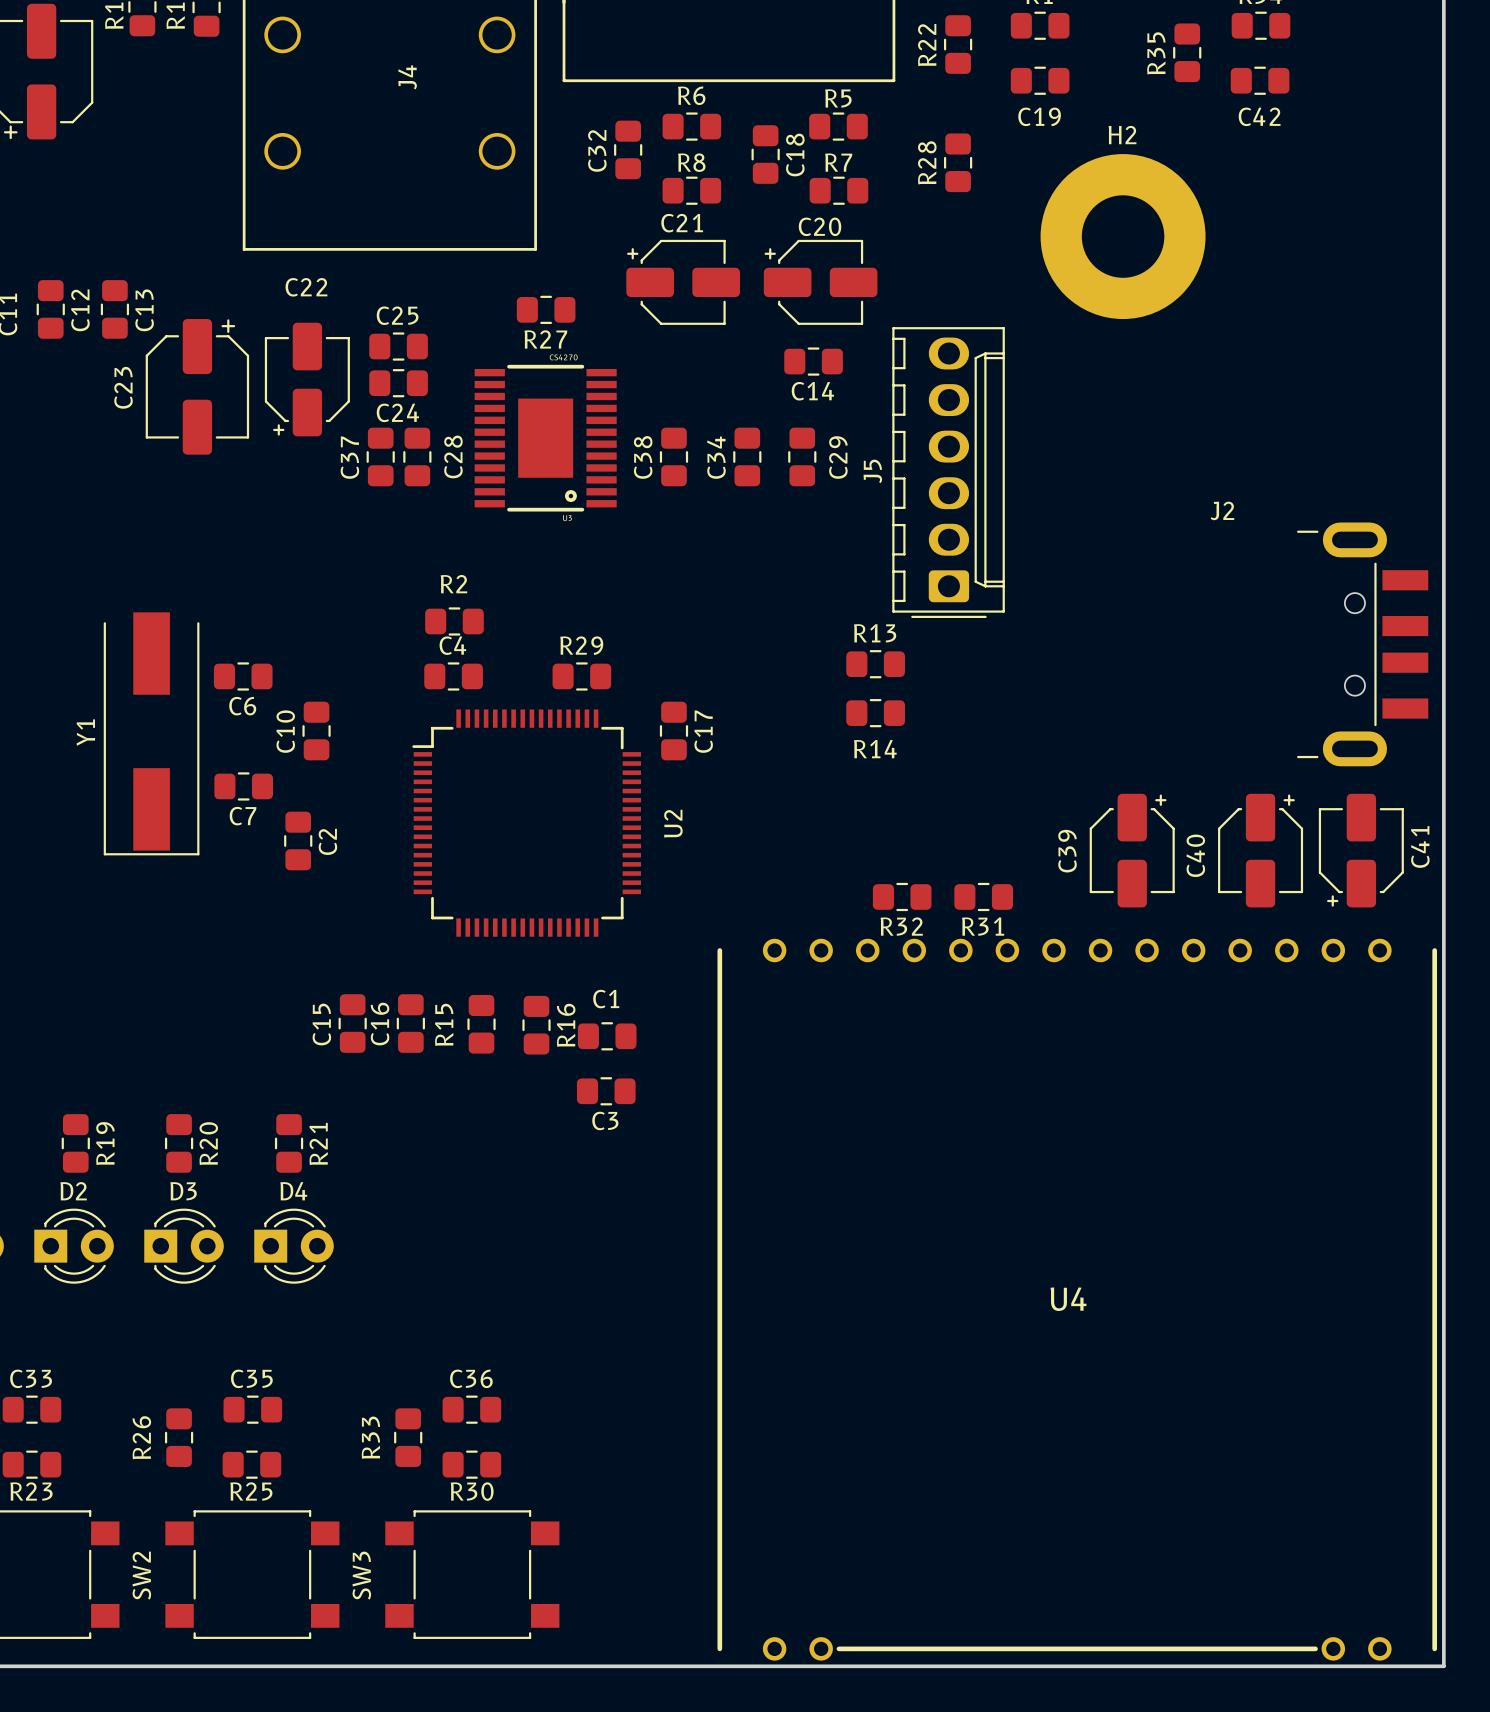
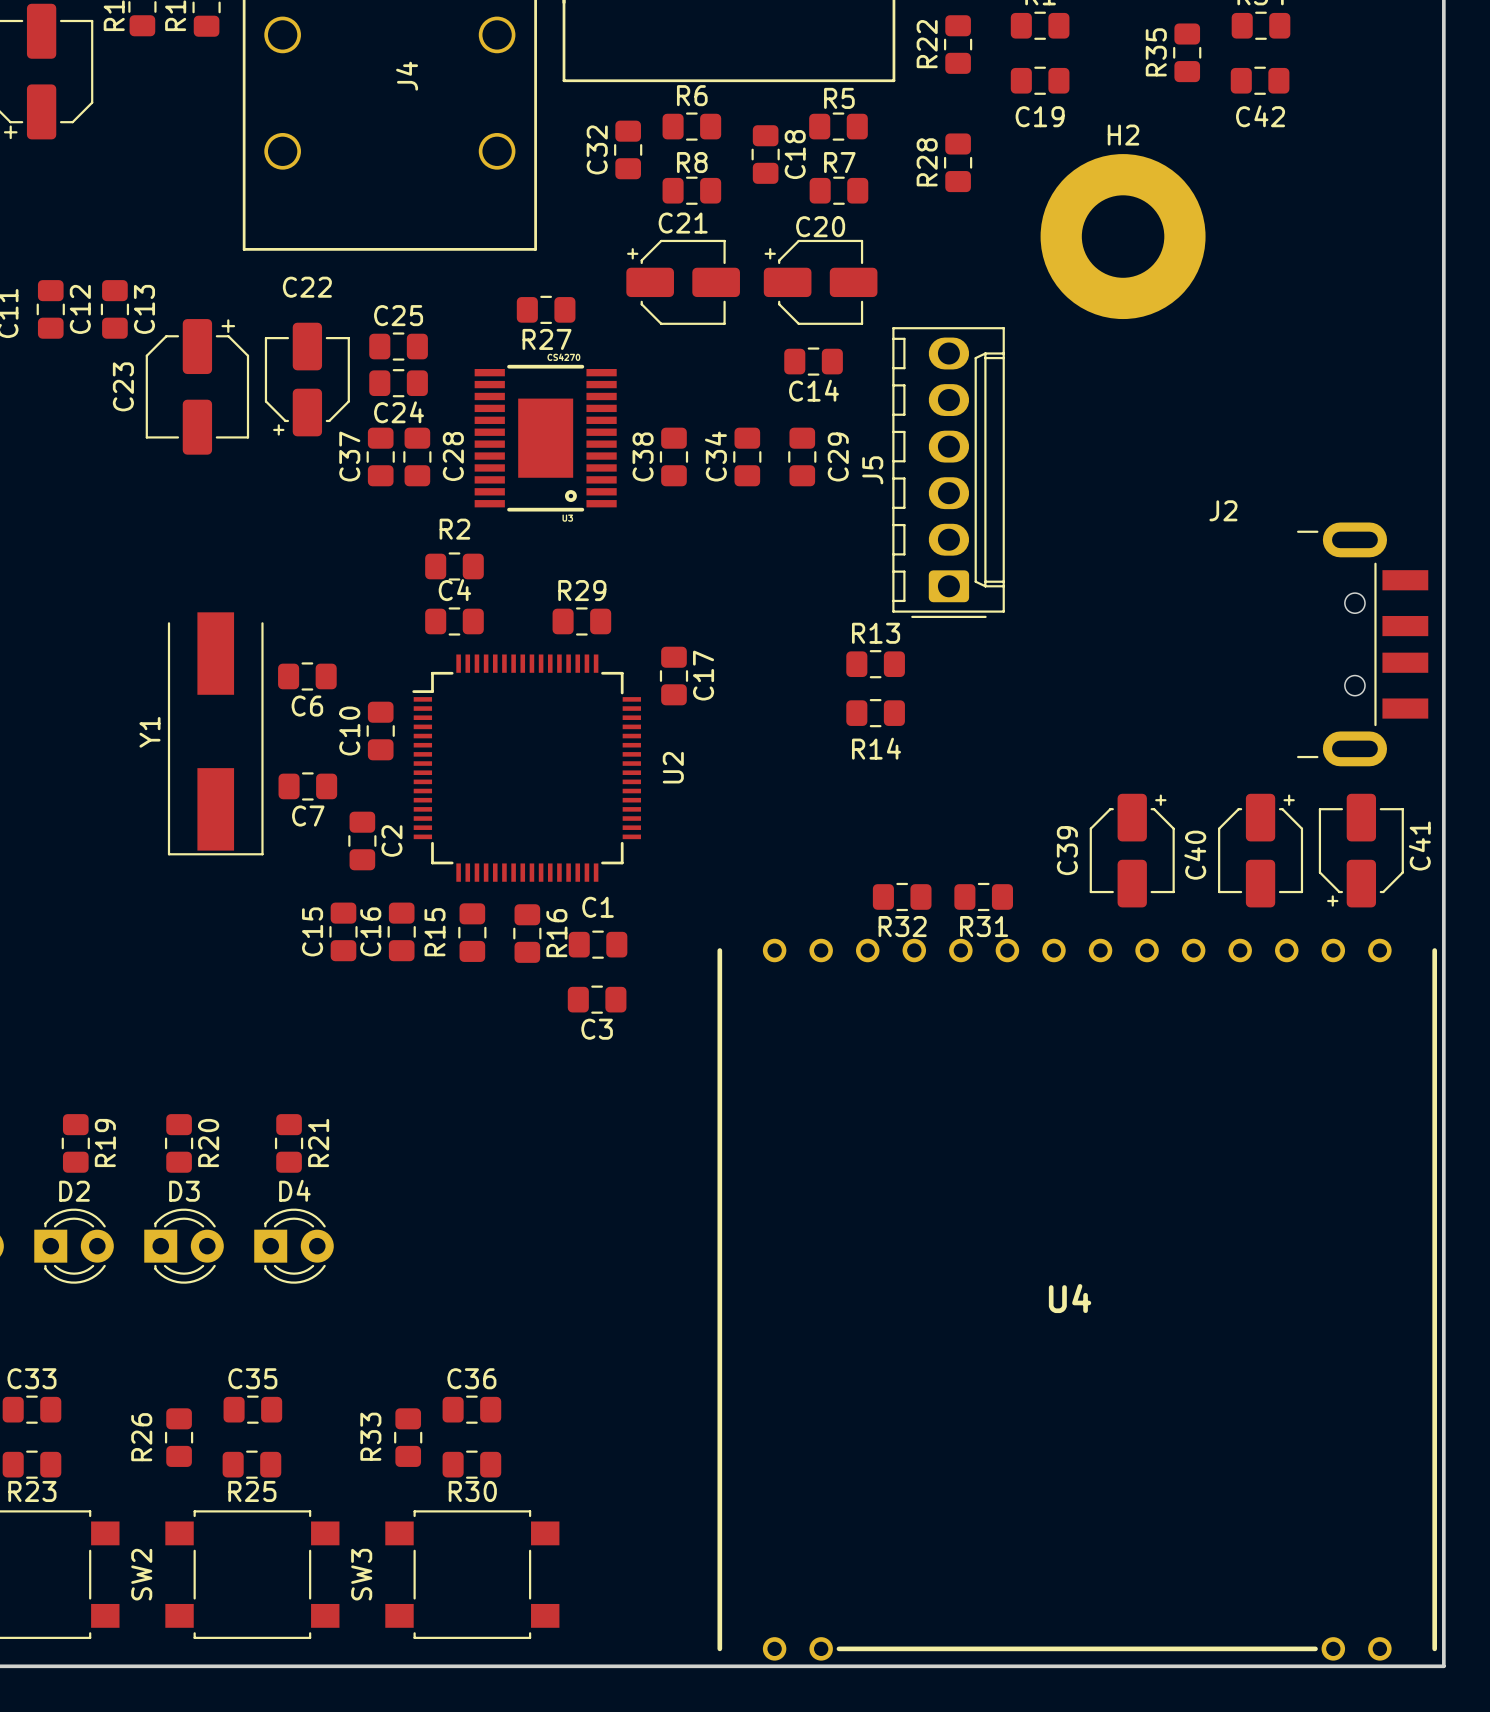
R2: none -> (454, 566)
R2 name: R2 (453, 584) -> C4 (454, 590)
C6 position: (243, 676) -> (307, 676)
C4: (453, 676) -> none
R29 position: (581, 676) -> (581, 621)
C10 position: (316, 731) -> (380, 731)
C17 position: (673, 731) -> (673, 676)
Y1 position: (151, 733) -> (215, 733)
C7 position: (243, 786) -> (307, 786)
U2 position: (526, 823) -> (526, 768)
C2 position: (298, 840) -> (362, 840)
C15 position: (352, 1023) -> (343, 931)
C16 position: (410, 1023) -> (401, 931)
R15 position: (481, 1024) -> (472, 932)
R16 position: (536, 1025) -> (527, 933)
C1 position: (607, 1036) -> (598, 944)
C3 position: (606, 1091) -> (597, 999)

